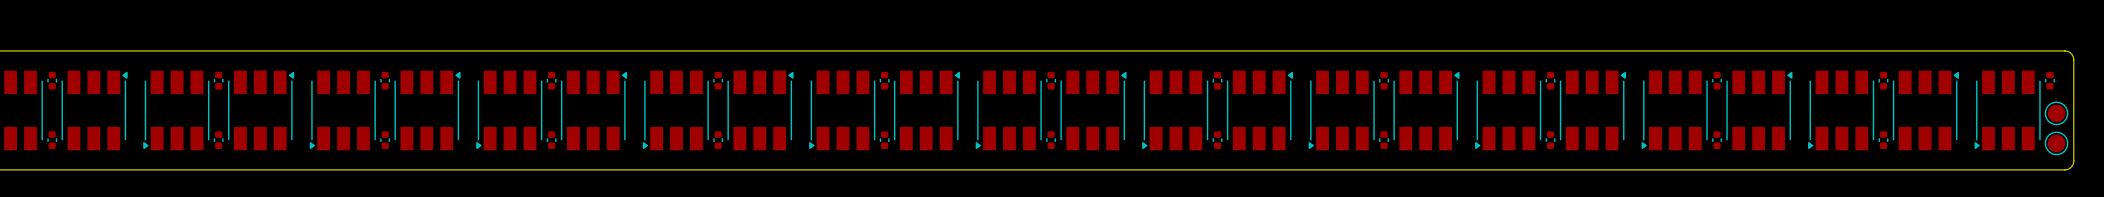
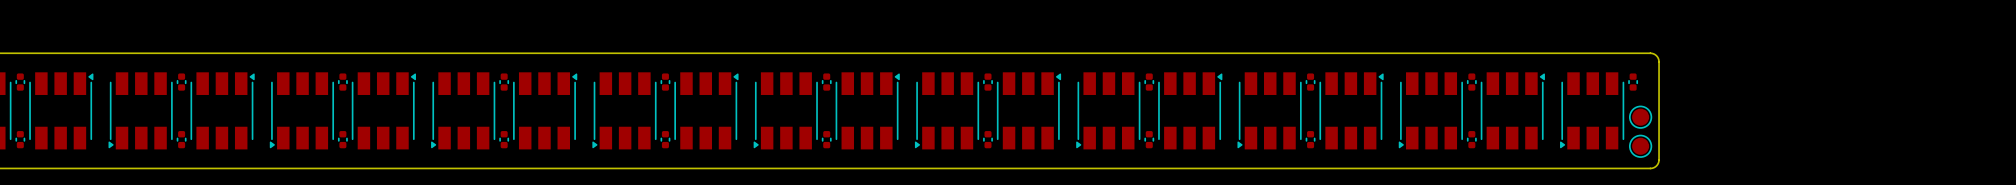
board edge: (1734, 50) (2064, 50) (2071, 53) (2073, 59) (2073, 160) (2071, 166) (2067, 169) (1734, 169) -> (1650, 53) (1656, 55) (1659, 61) (1658, 160) (1655, 166) (1650, 168)
part: (1883, 80) -> none
part: (2049, 80) -> none
part: (1759, 110) -> none
part: (1841, 110) -> none
part: (1925, 110) -> none
part: (2007, 110) -> none
part: (2056, 113) -> none
part: none -> (1640, 117)
part footprint: [1712, 131, 1722, 150] -> [1629, 134, 1653, 158]
part: (1883, 140) -> none
part: (2056, 143) -> none

